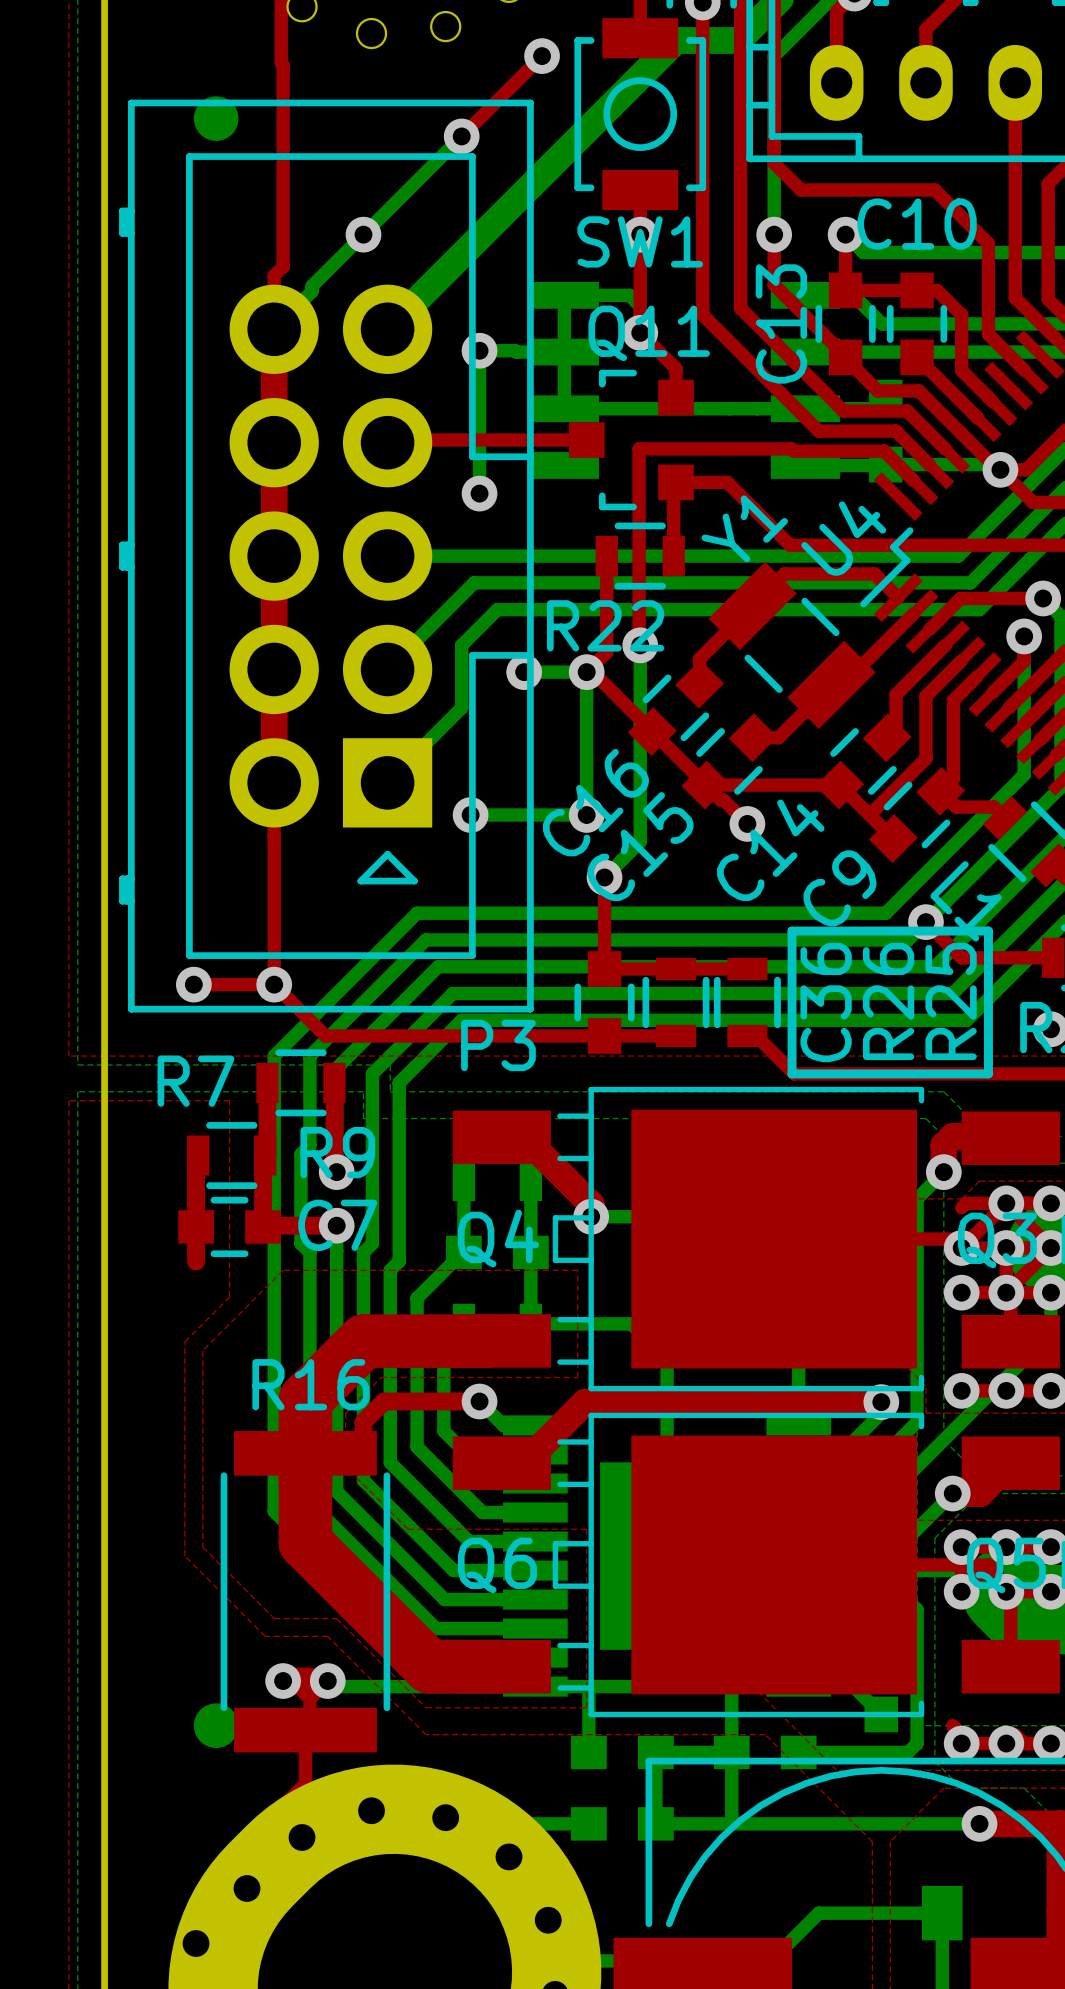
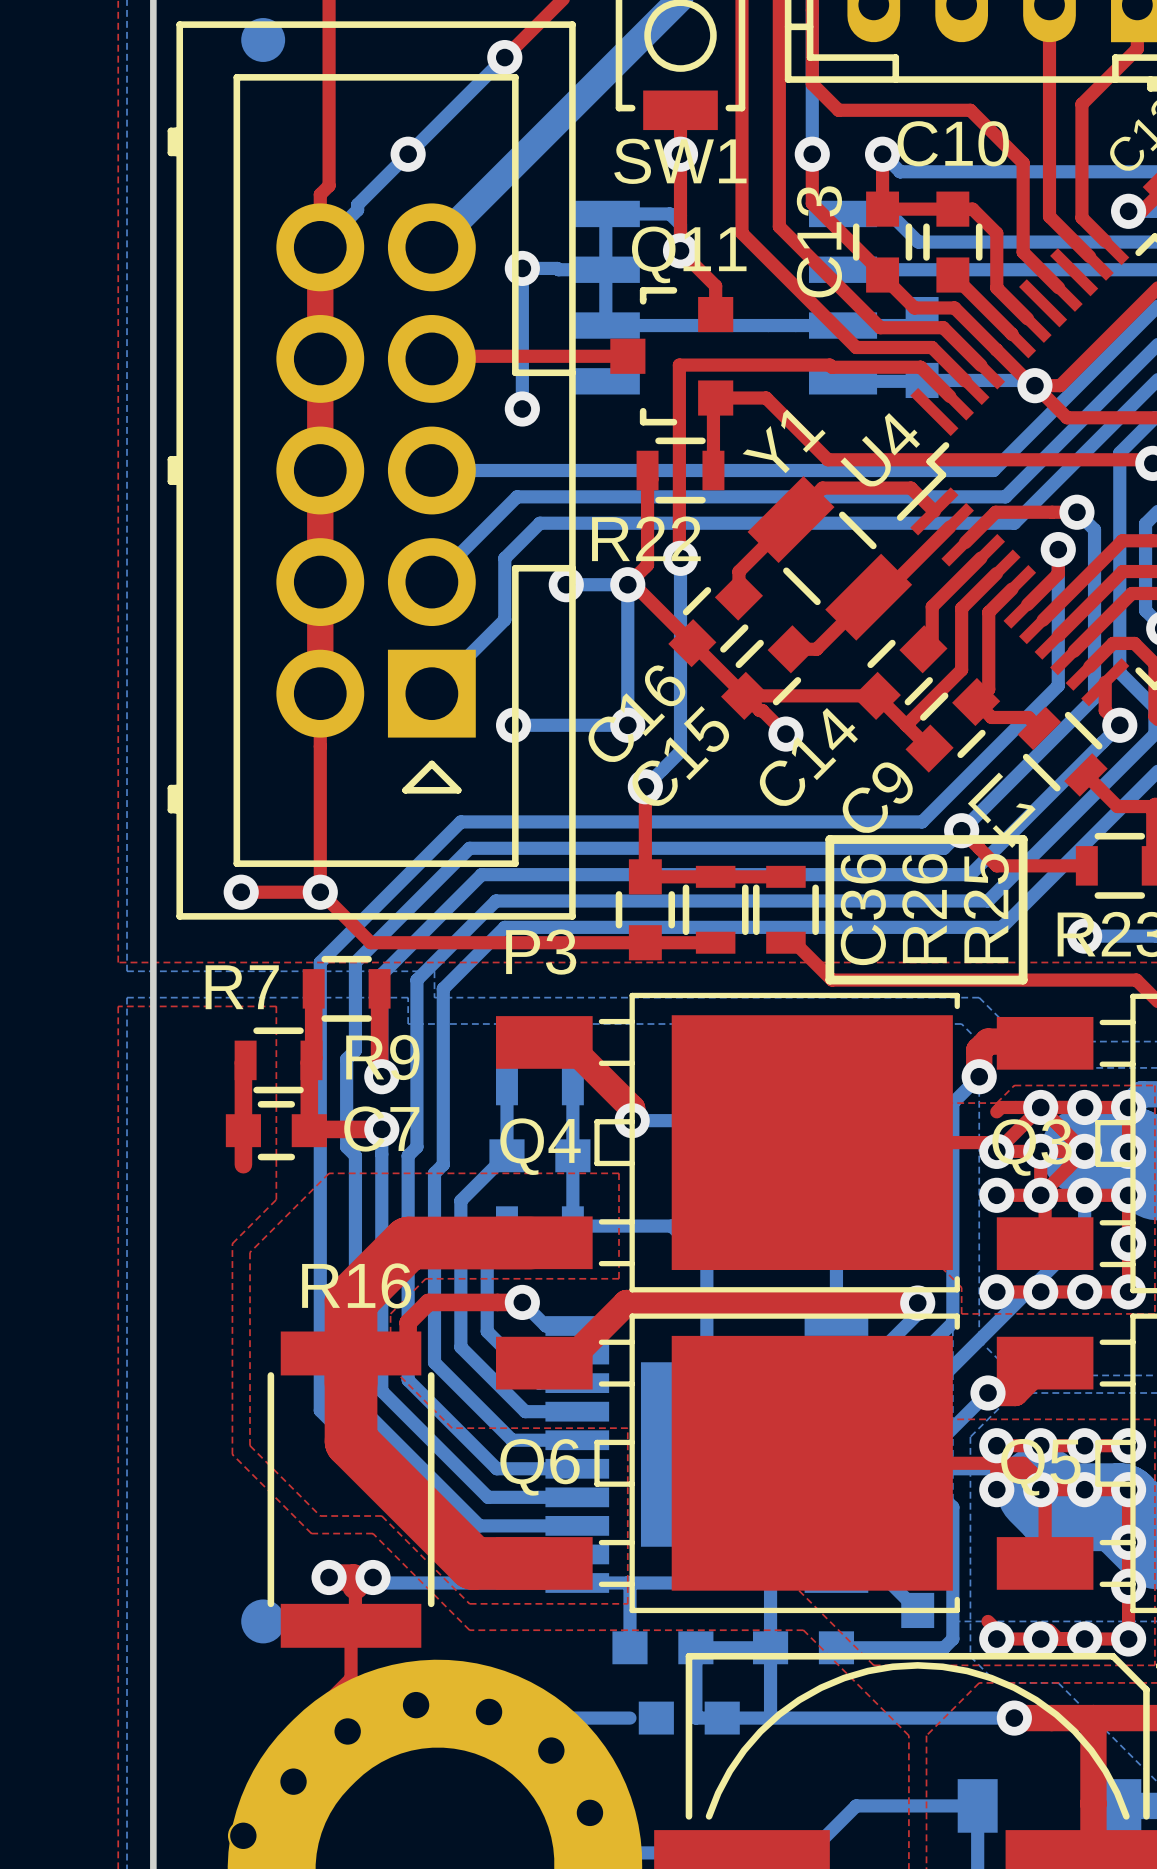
part position: (622, 1823) -> (689, 1718)

